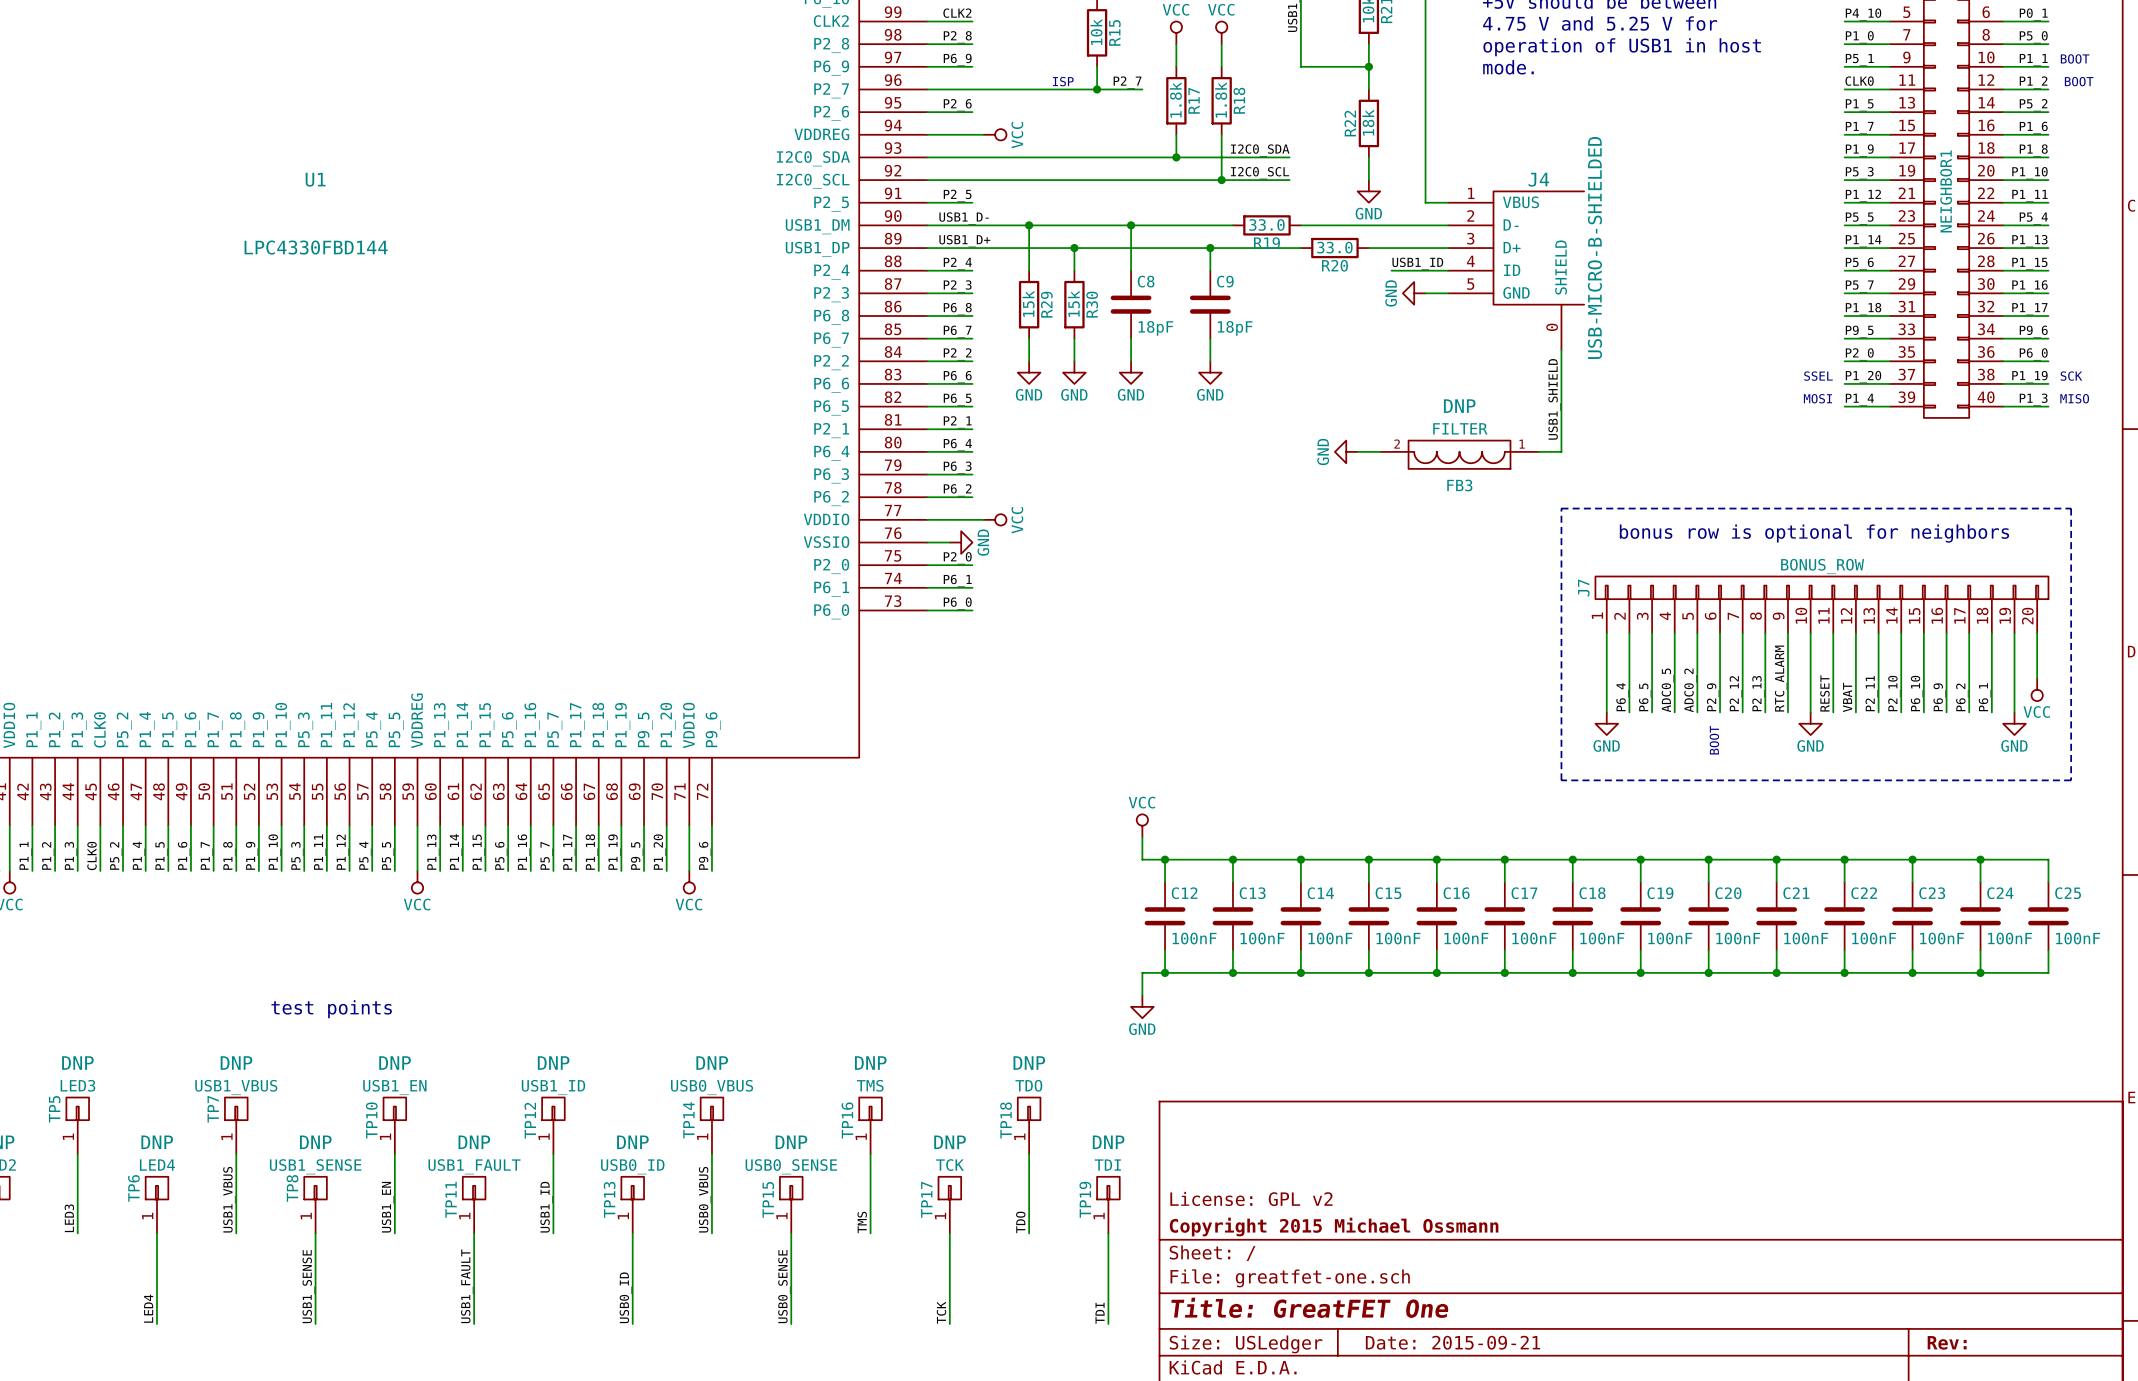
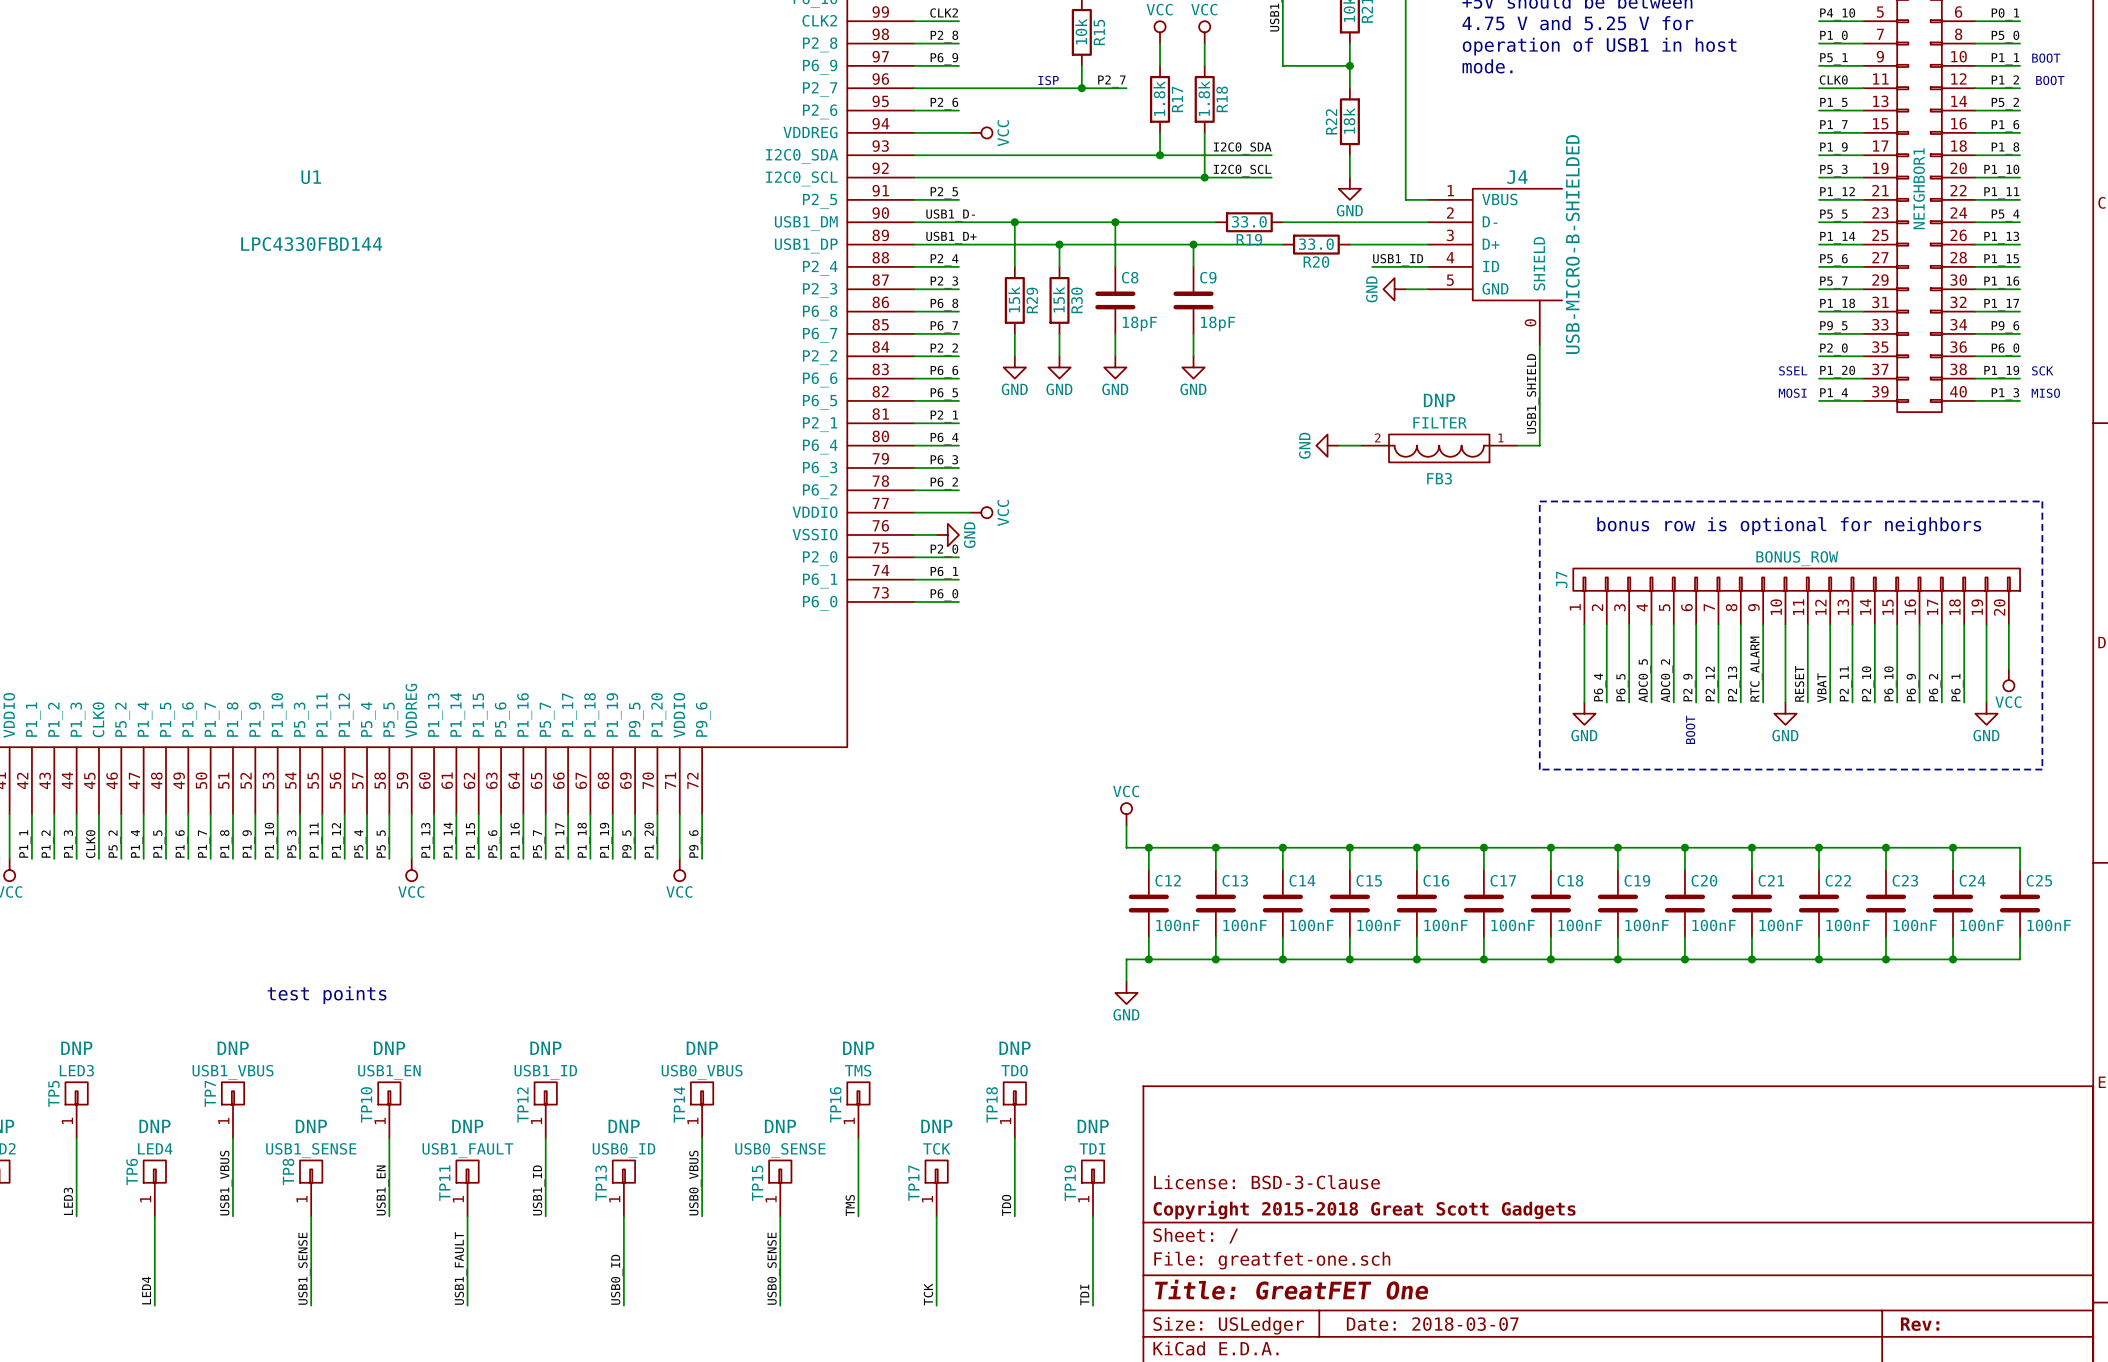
title block: License: GPL v2 (1251, 1198) -> License: BSD-3-Clause (1266, 1182)
title block: Copyright 2015 Michael Ossmann (1334, 1227) -> Copyright 2015-2018 Great Scott Gadgets (1364, 1209)
title block: Date: 2015-09-21 (1452, 1342) -> Date: 2018-03-07 (1432, 1324)

